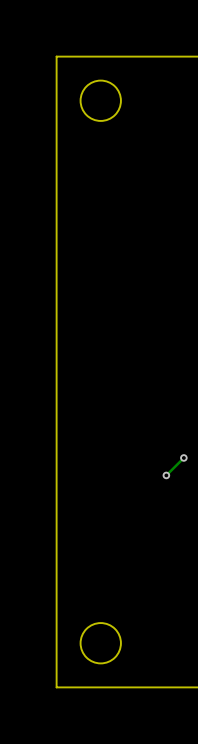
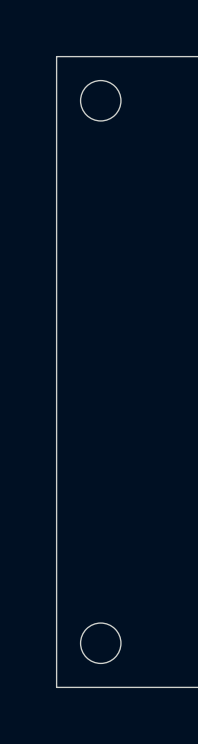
track: (183, 457) (166, 475) -> none
via: (183, 457) -> none
via: (166, 475) -> none

